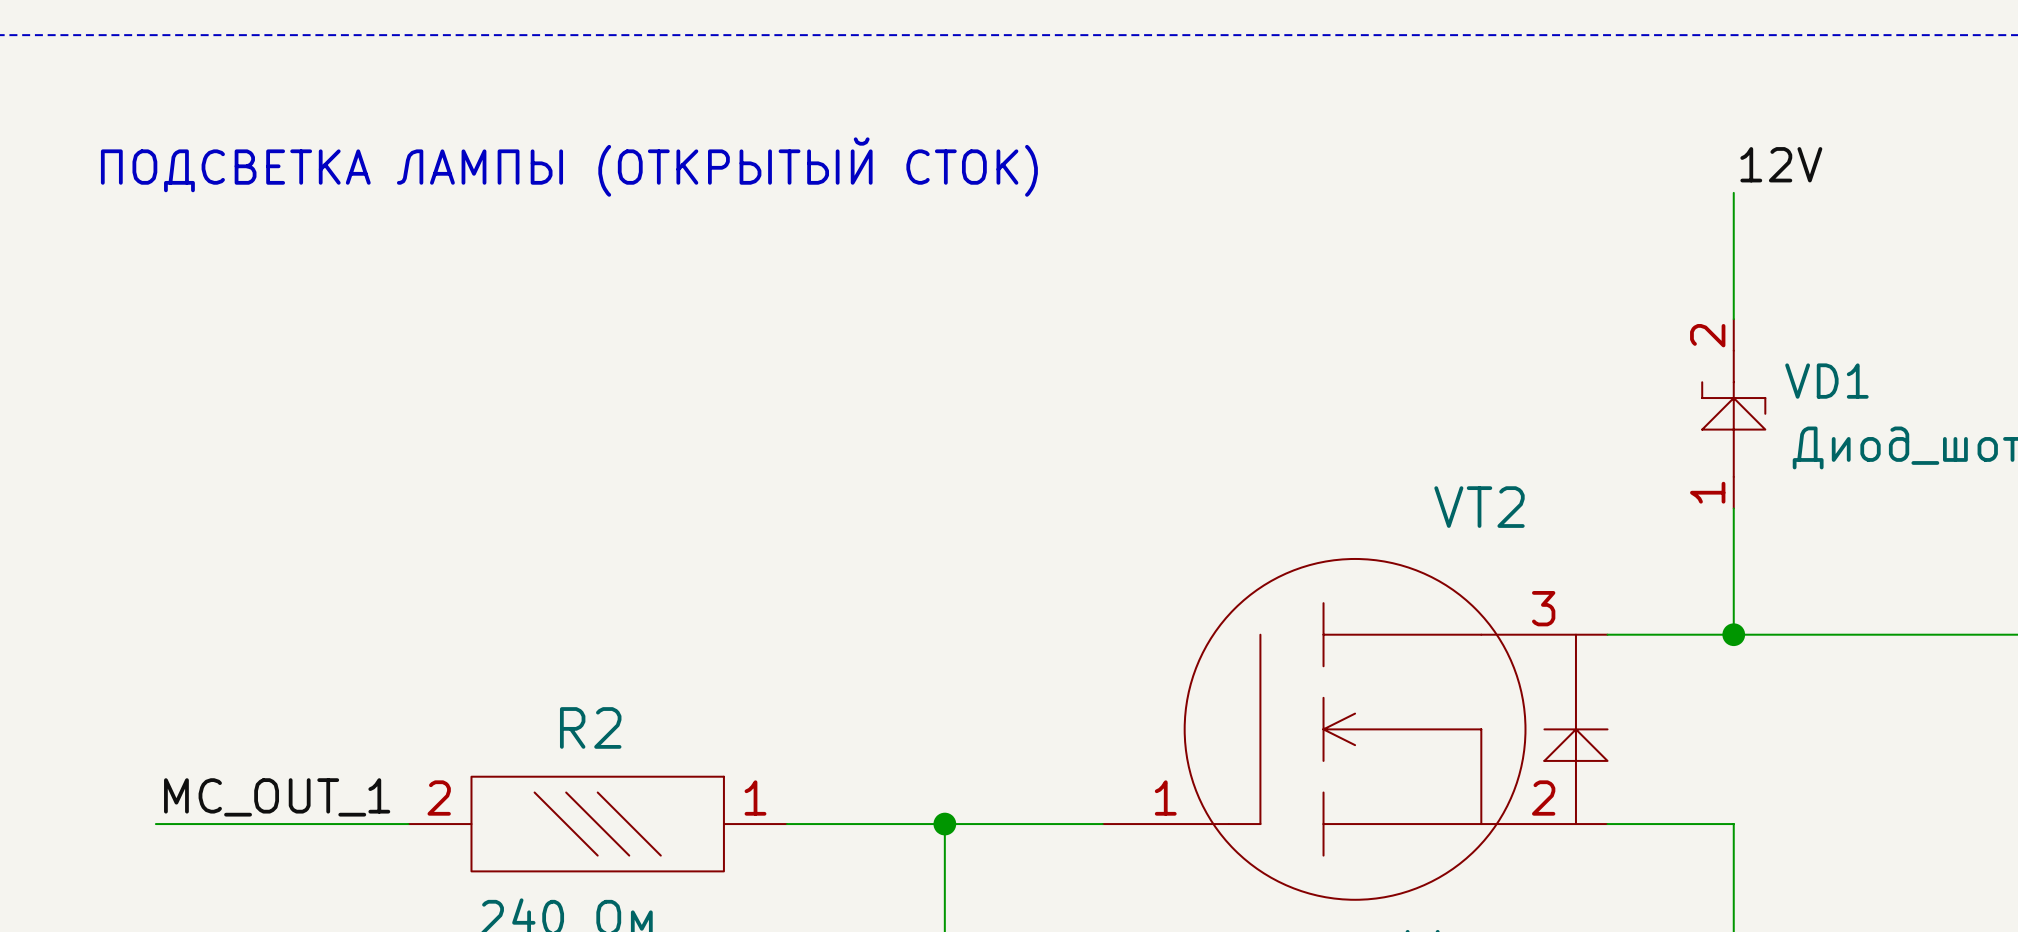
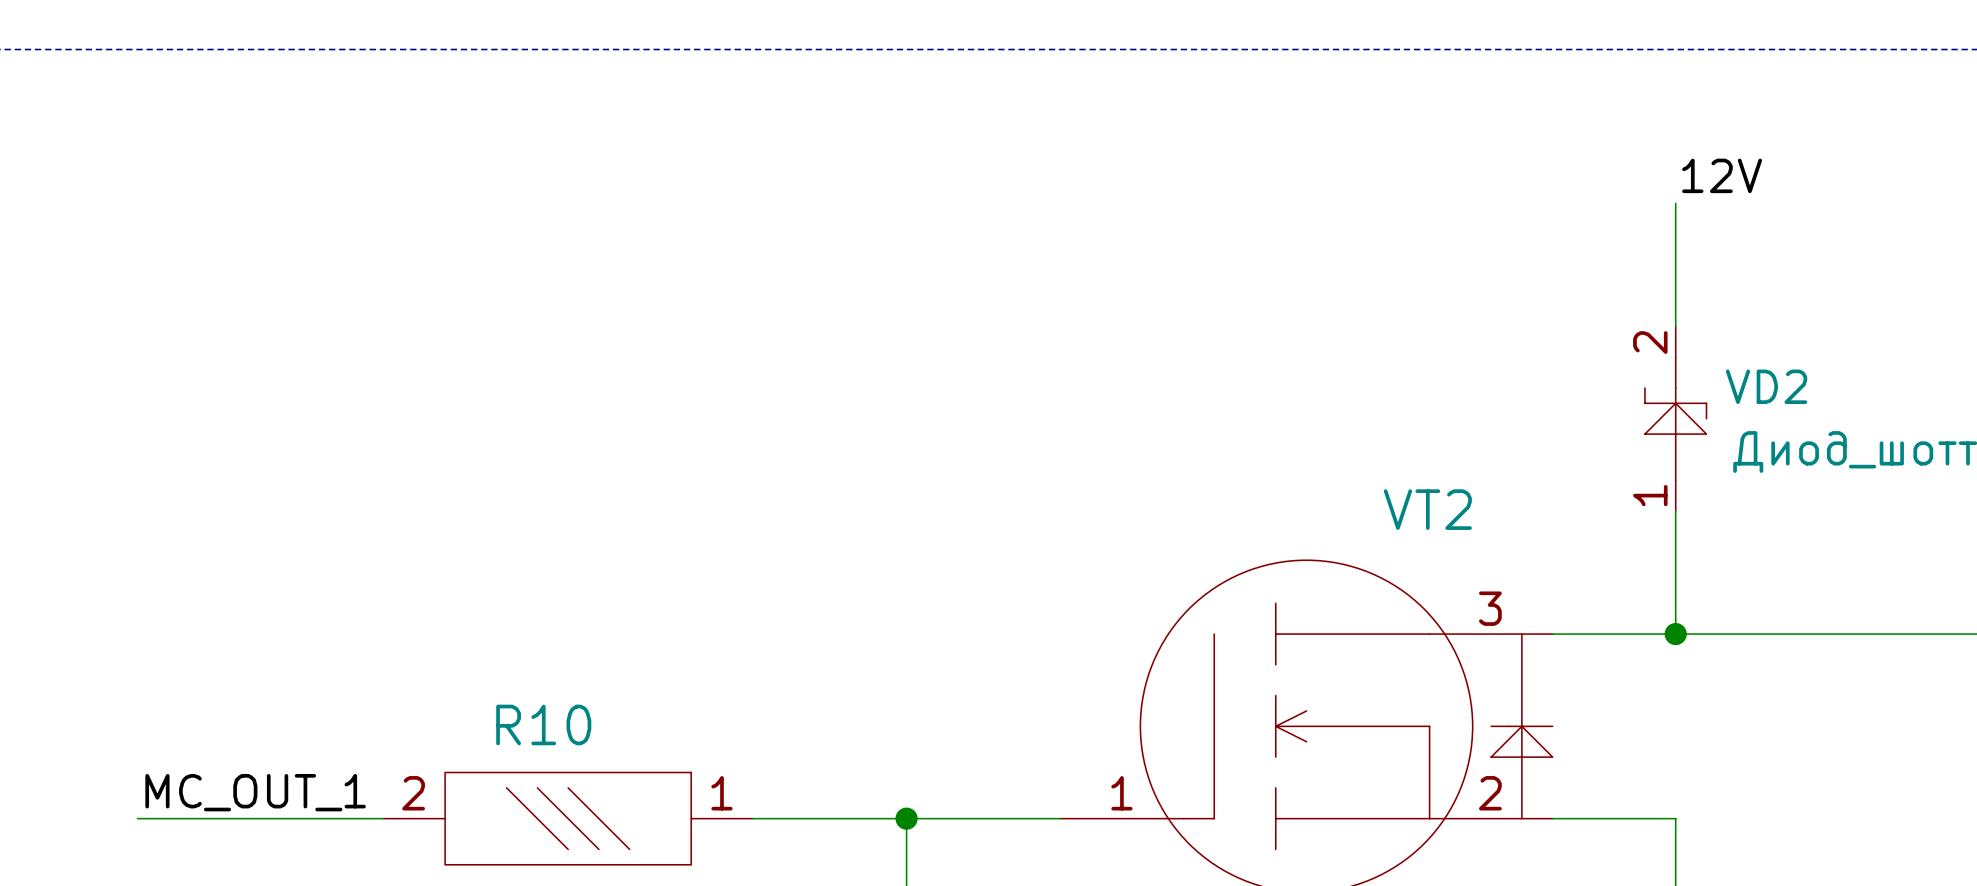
text: ПОДСВЕТКА ЛАМПЫ (ОТКРЫТЫЙ СТОК) (569, 167) -> none
VD1 name: VD1 (1826, 381) -> VD2 (1766, 386)
R2 name: R2 (590, 727) -> R10 (543, 724)

